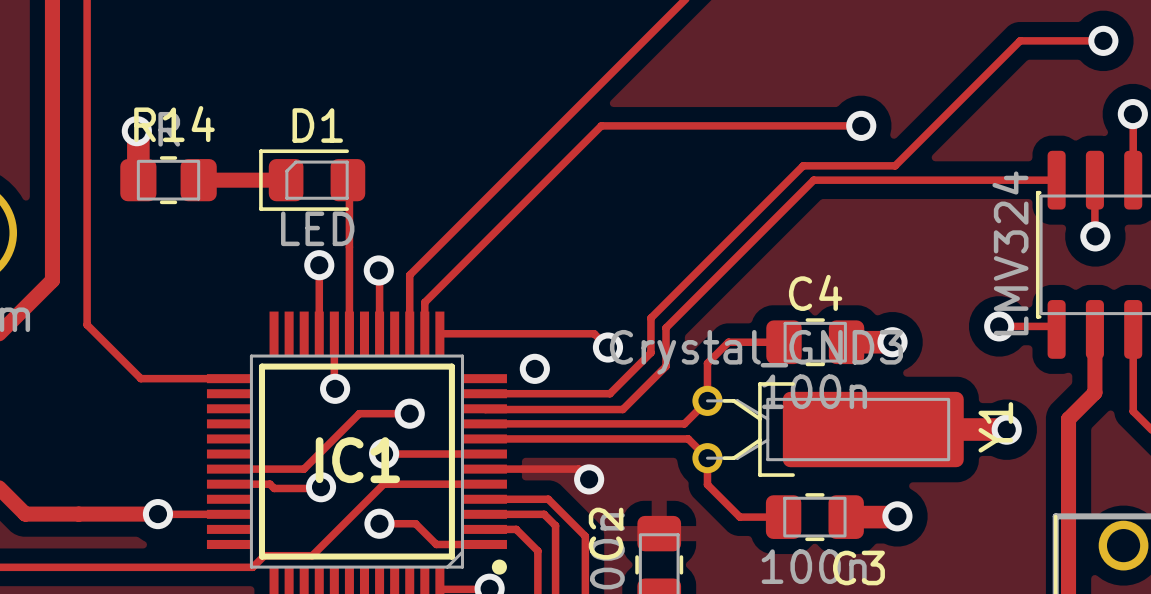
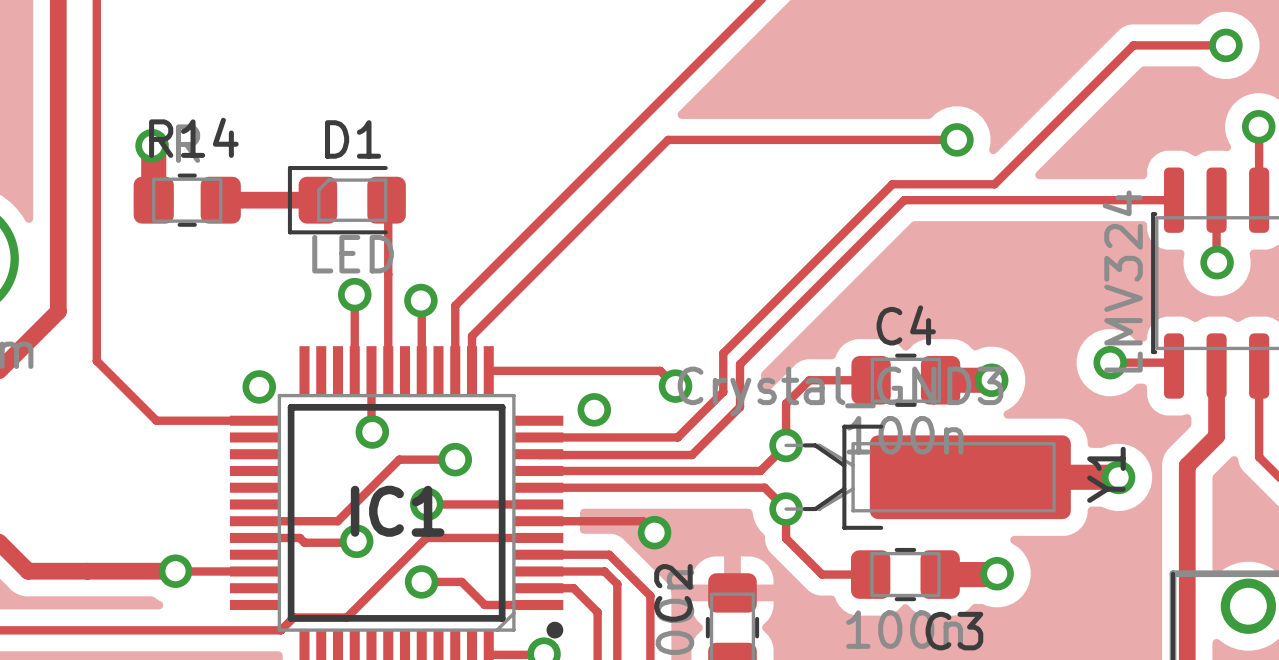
via: none -> (259, 386)

